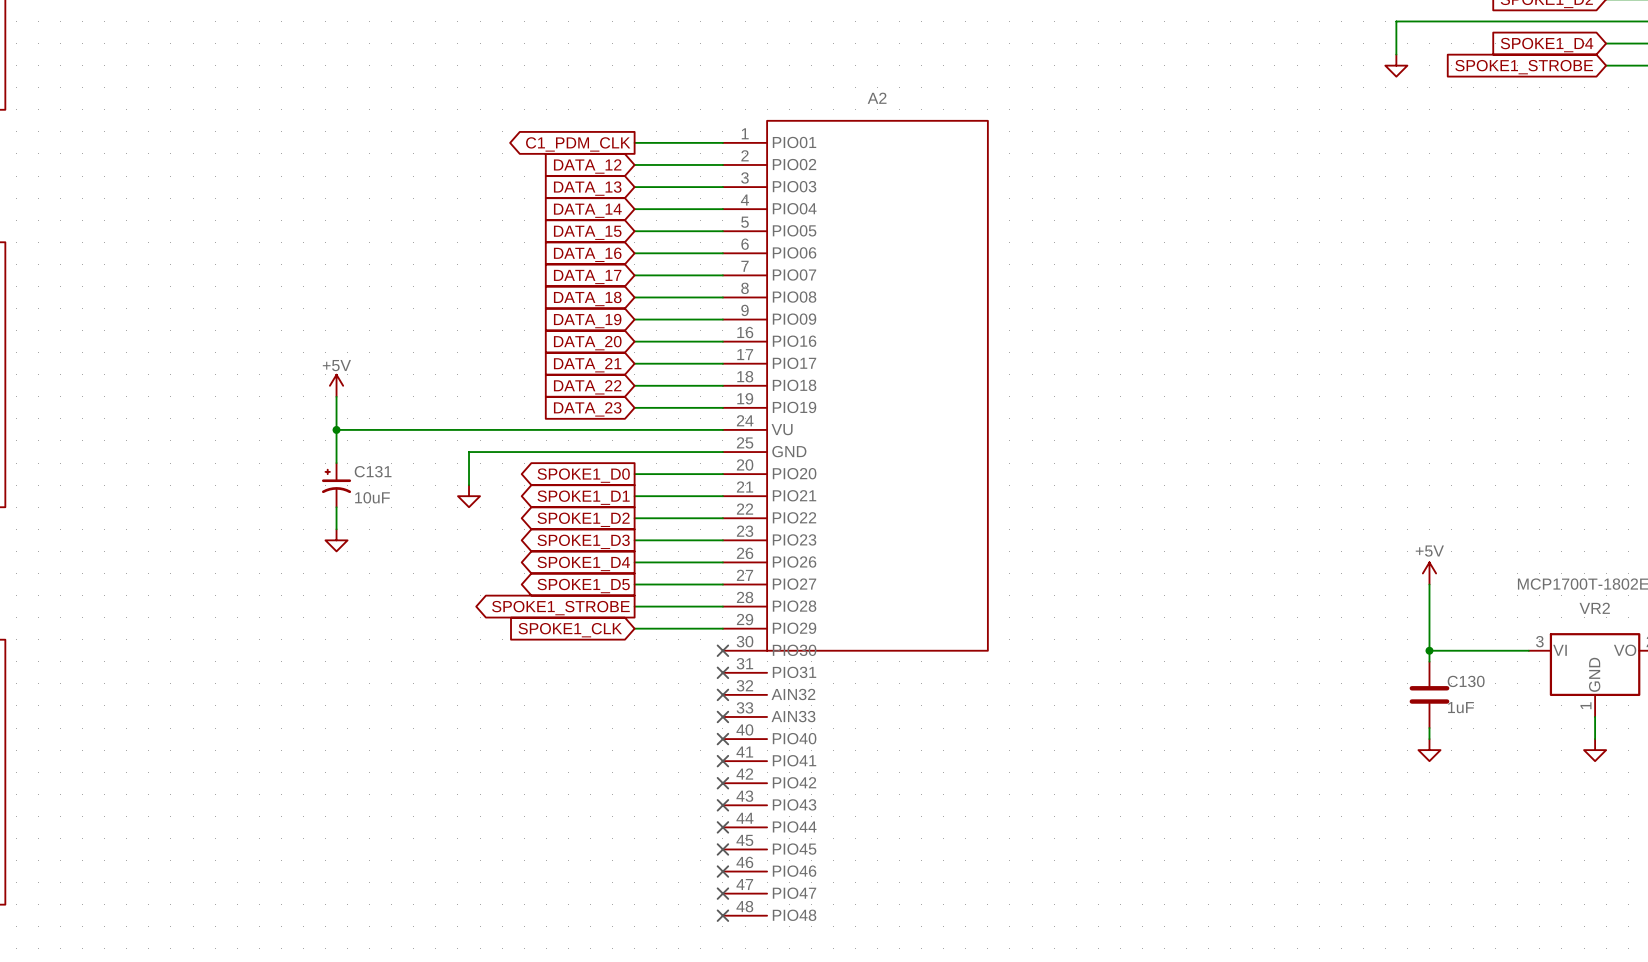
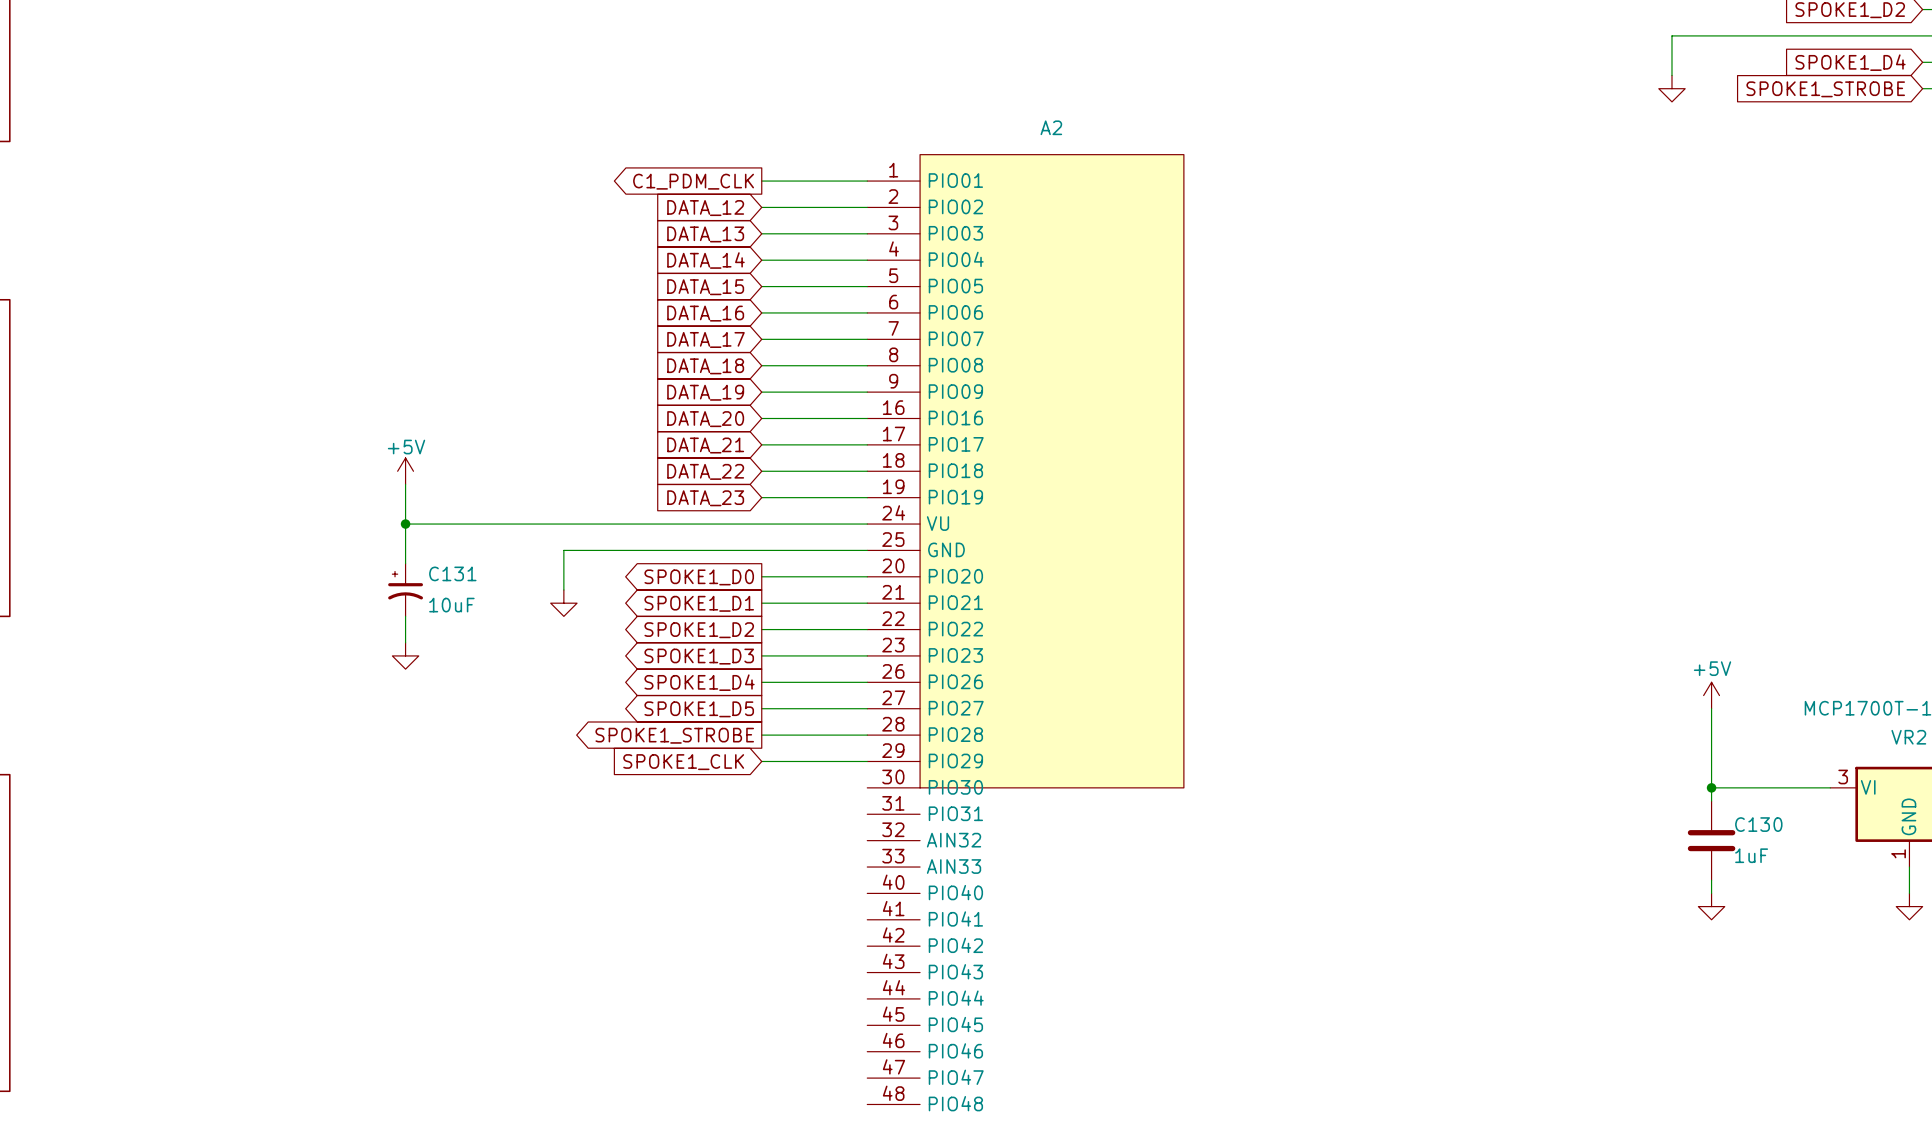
no-connect mark: (722, 650) -> none
no-connect mark: (722, 672) -> none
no-connect mark: (722, 694) -> none
no-connect mark: (722, 716) -> none
no-connect mark: (722, 739) -> none
no-connect mark: (722, 761) -> none
no-connect mark: (722, 783) -> none
no-connect mark: (722, 805) -> none
no-connect mark: (722, 827) -> none
no-connect mark: (722, 849) -> none
no-connect mark: (722, 871) -> none
no-connect mark: (722, 893) -> none
no-connect mark: (722, 915) -> none

